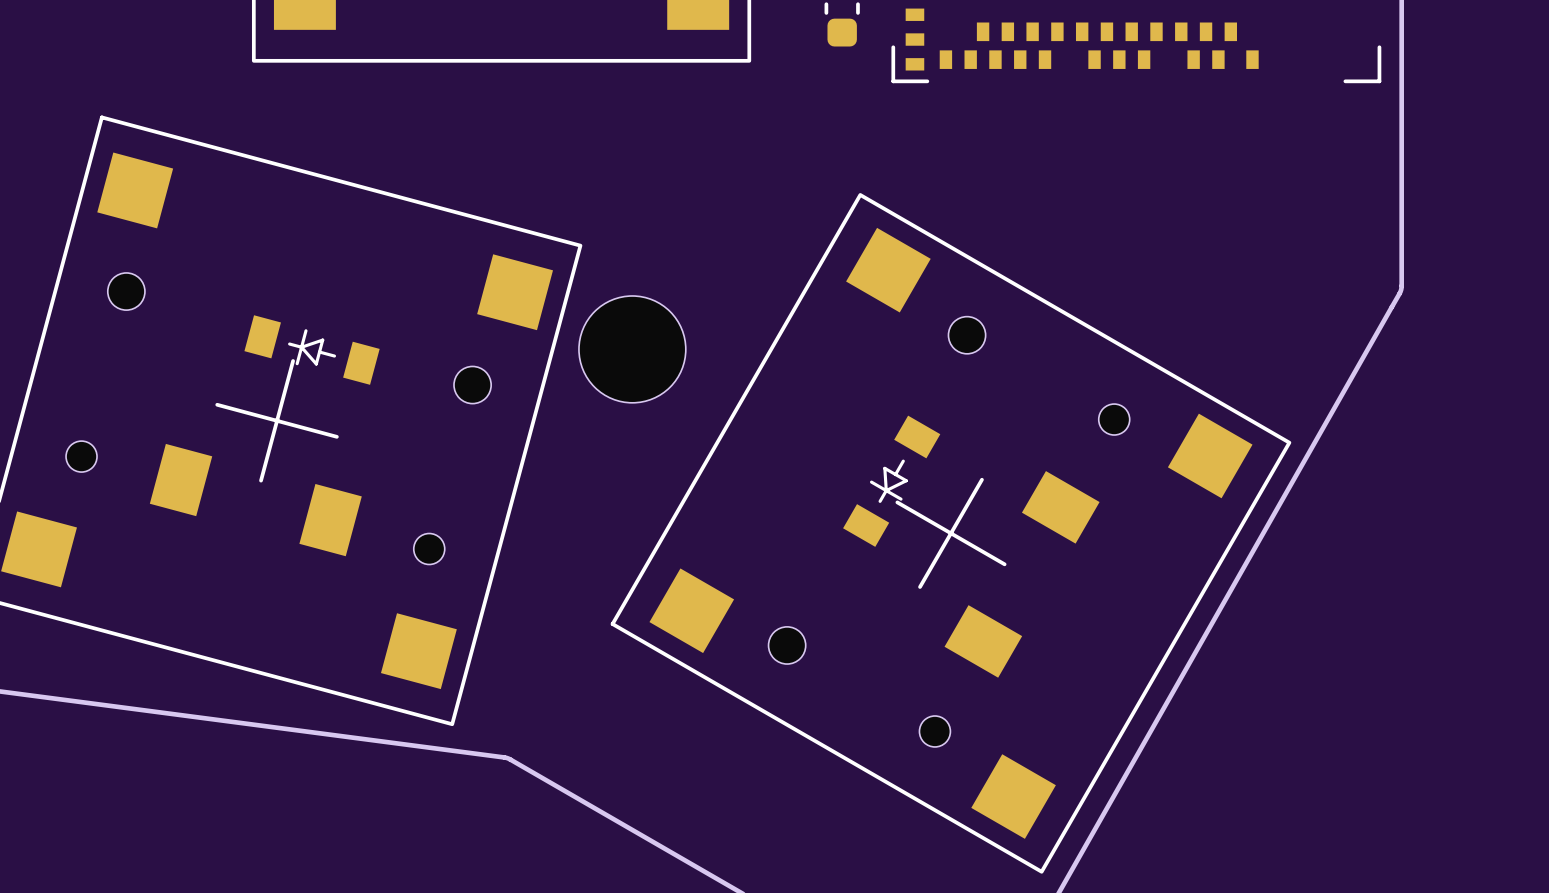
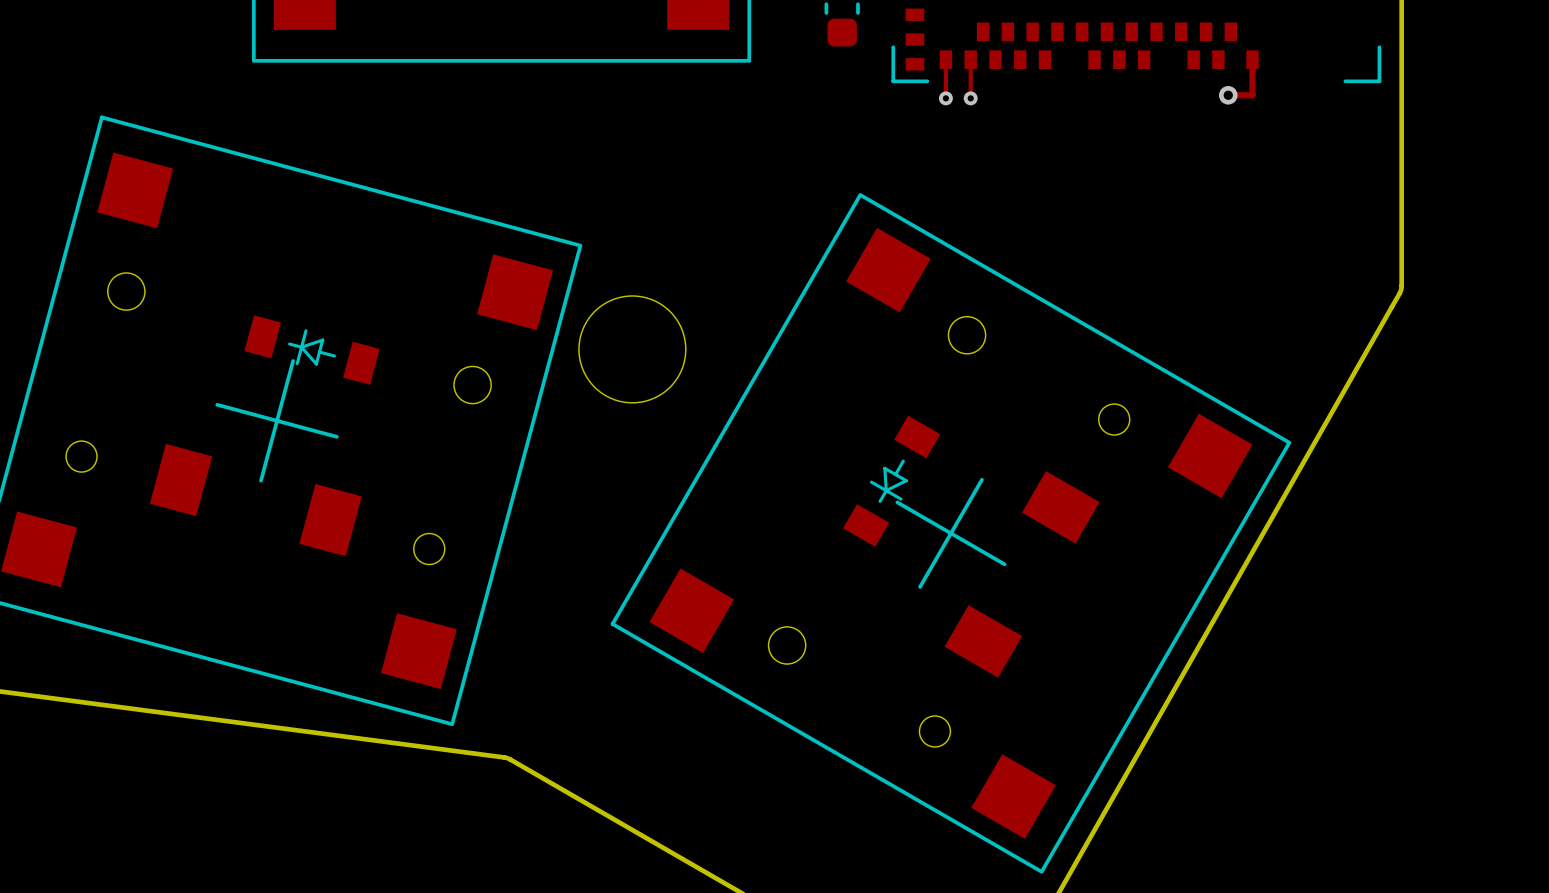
track: none -> (945, 59) (945, 98)
track: none -> (970, 59) (970, 98)
track: none -> (1252, 59) (1252, 95) (1228, 95)
via: none -> (1228, 95)
via: none -> (945, 98)
via: none -> (970, 98)

